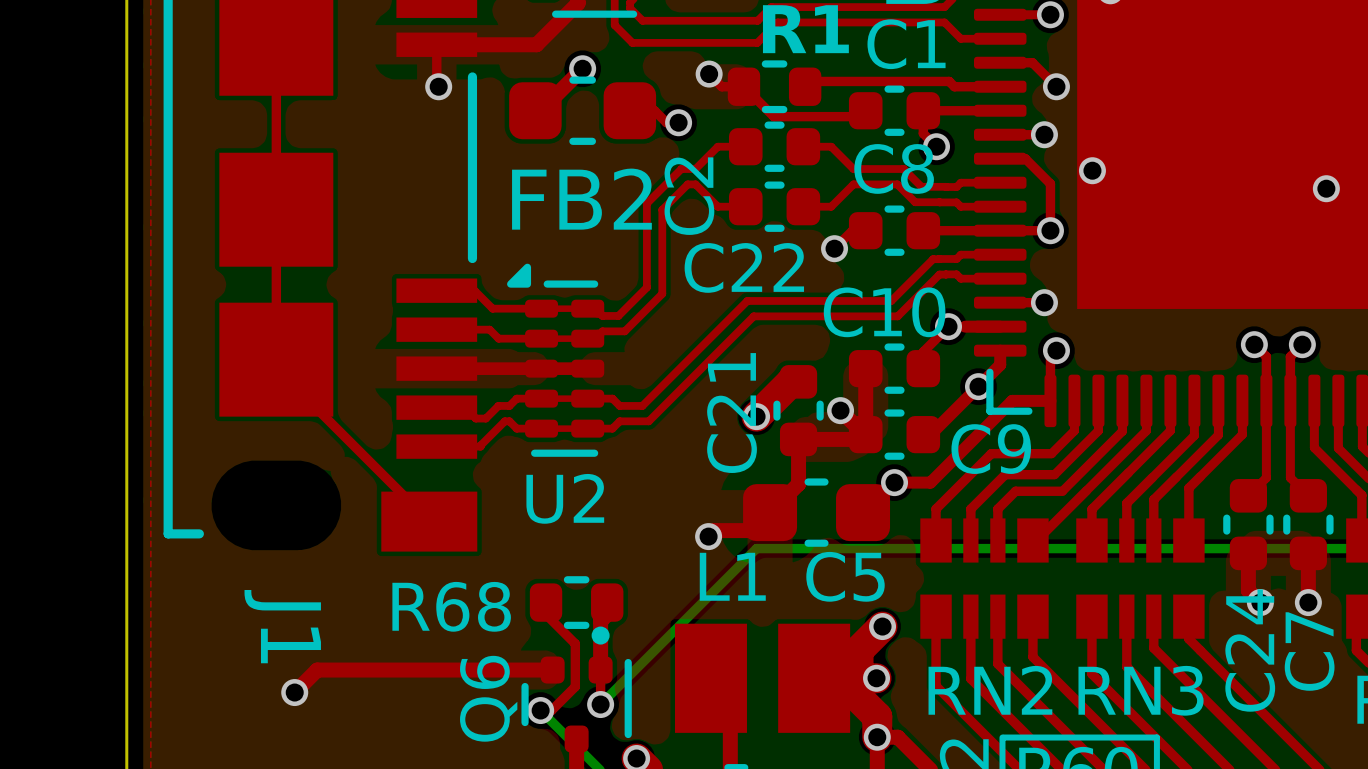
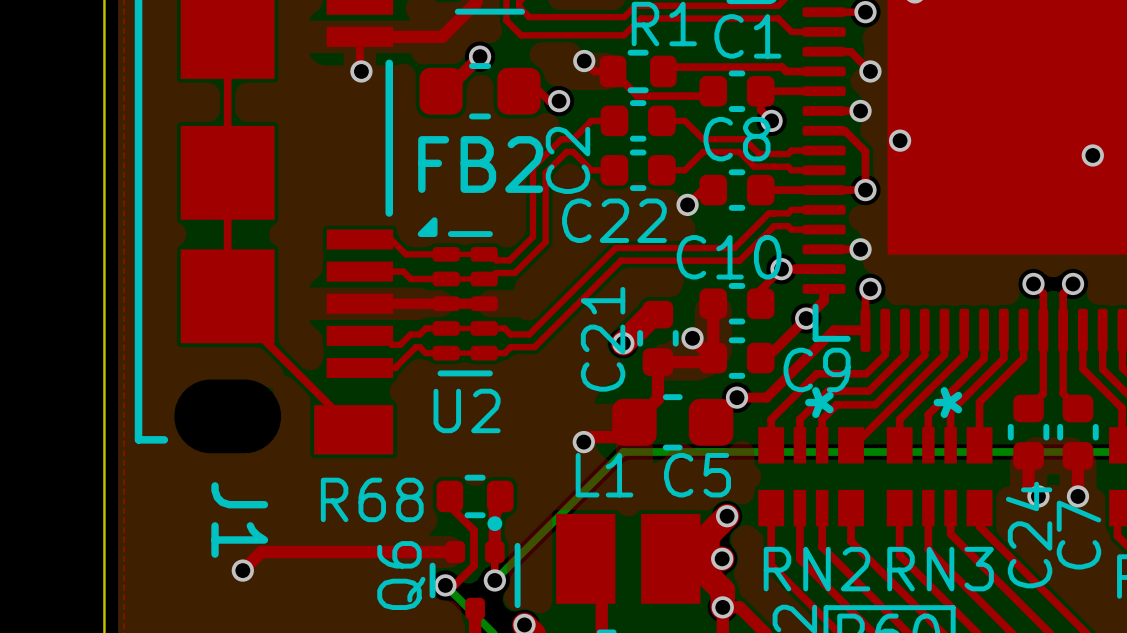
RN2 text: none -> * (819, 402)
RN3 text: none -> * (947, 402)

